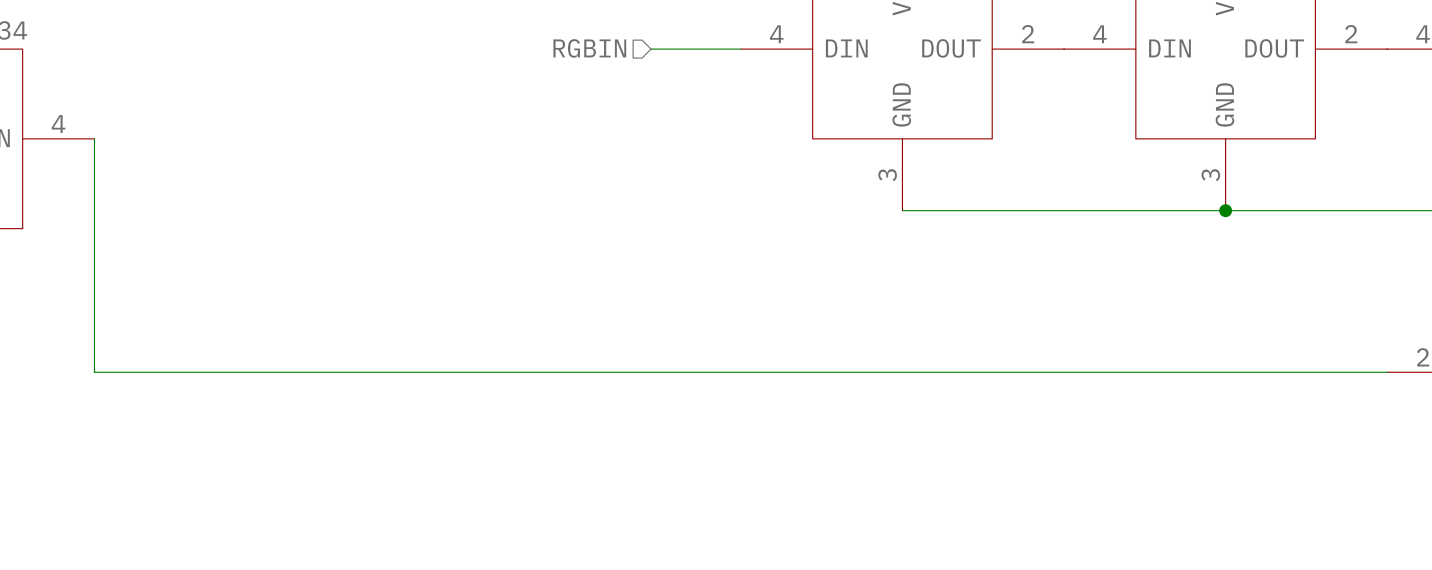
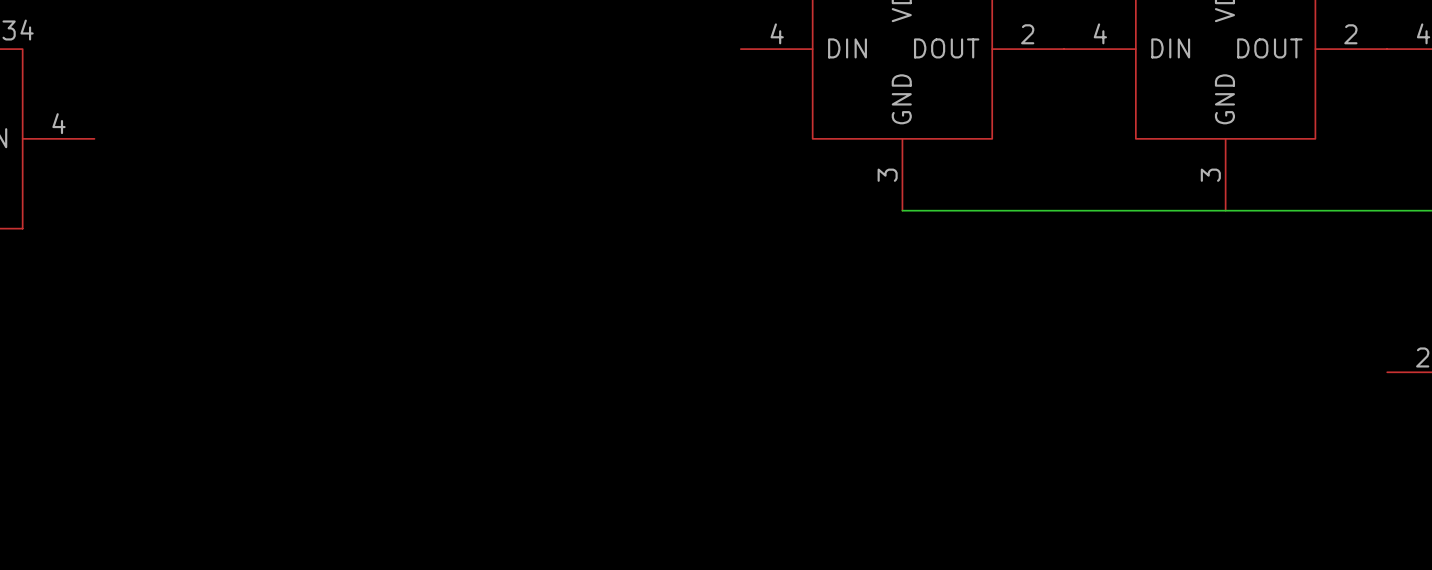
hierarchical label: RGBIN (589, 48) -> none
wire: (651, 49) (740, 49) -> none
wire: (94, 138) (94, 372) (1387, 372) -> none
junction: (1225, 210) -> none

